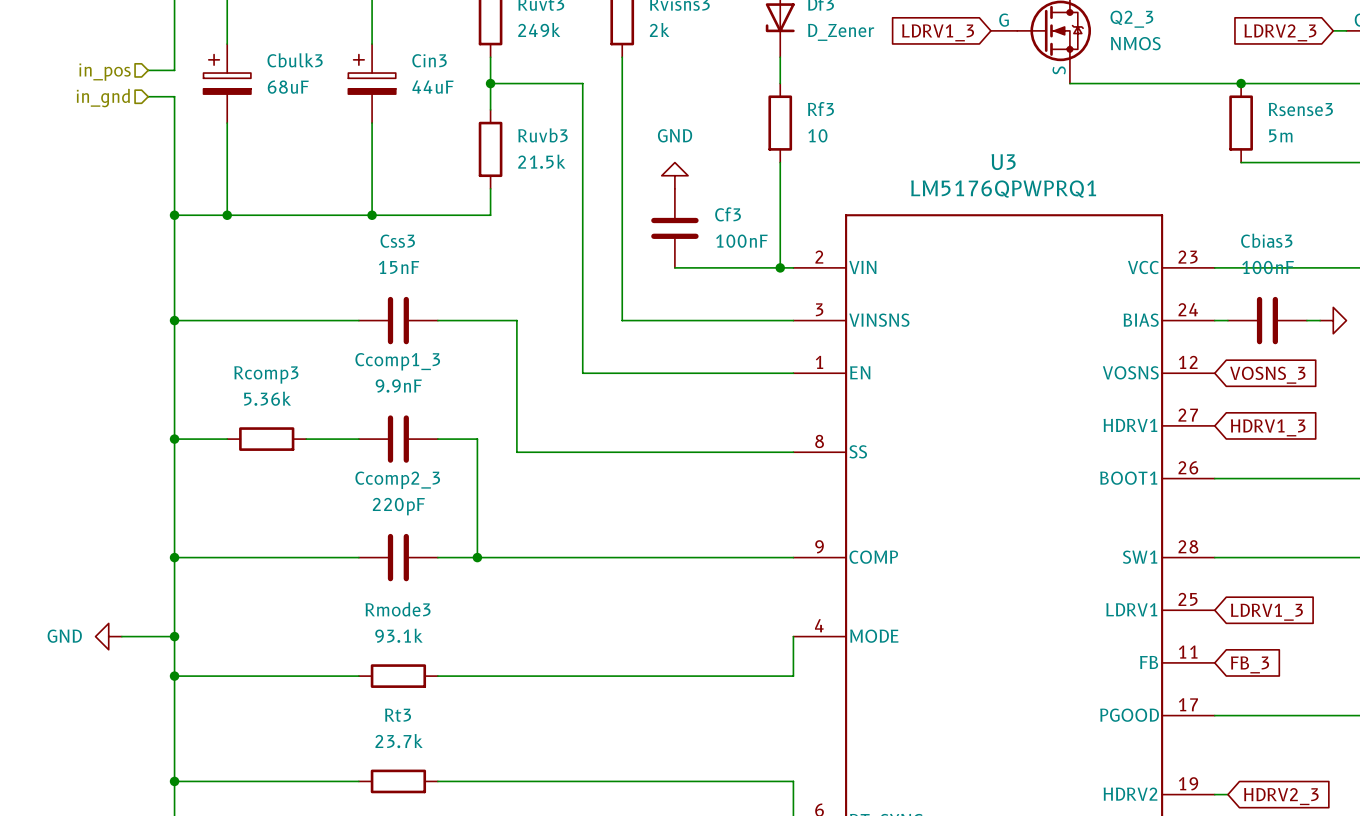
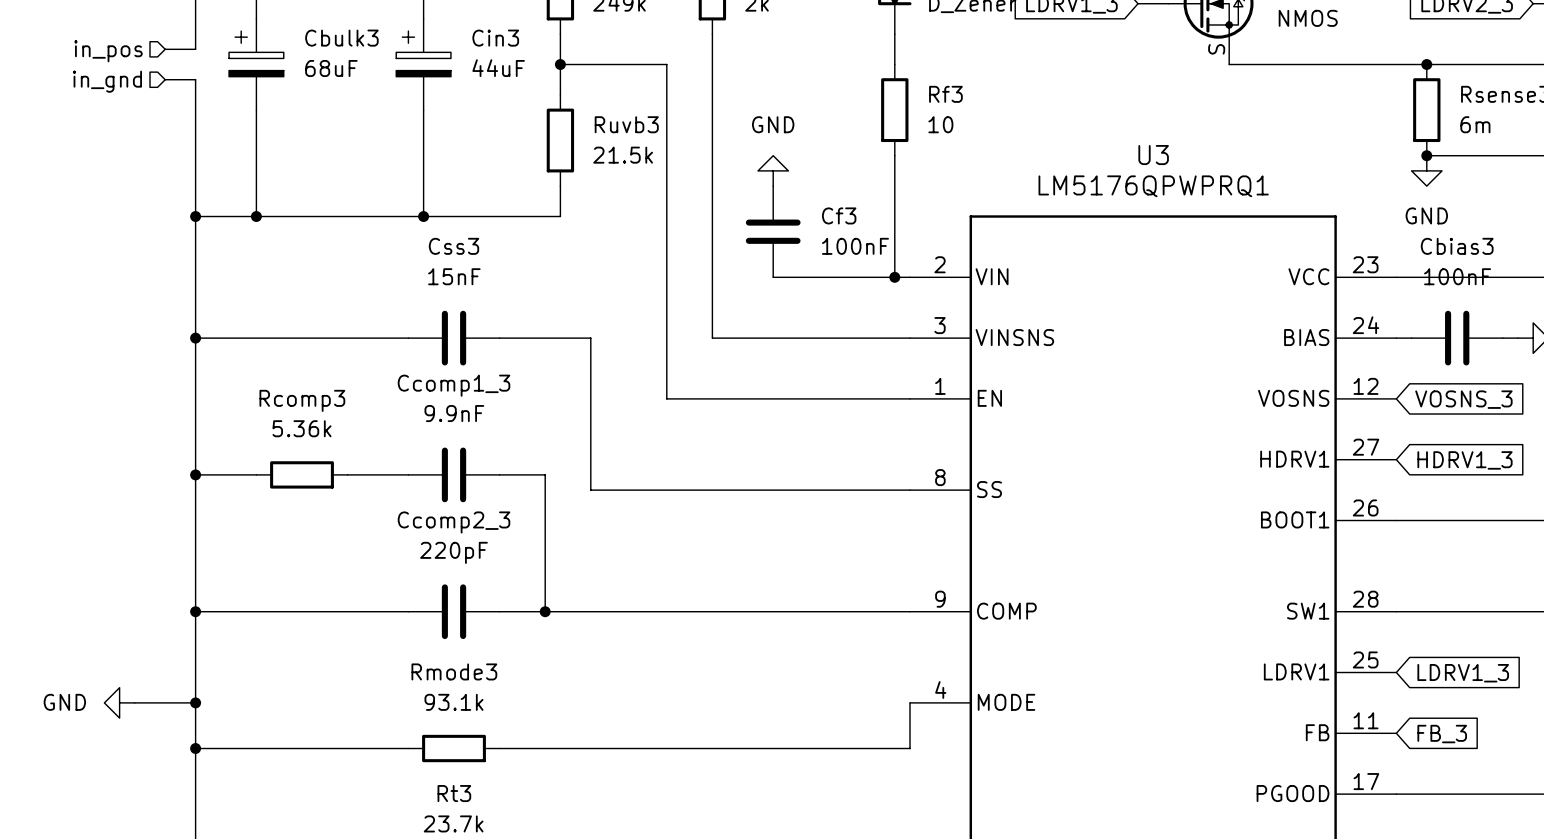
Rsense3 value: 5m (1280, 135) -> 6m (1475, 124)
junction: none -> (1426, 155)
power symbol: none -> GND (1426, 170)

